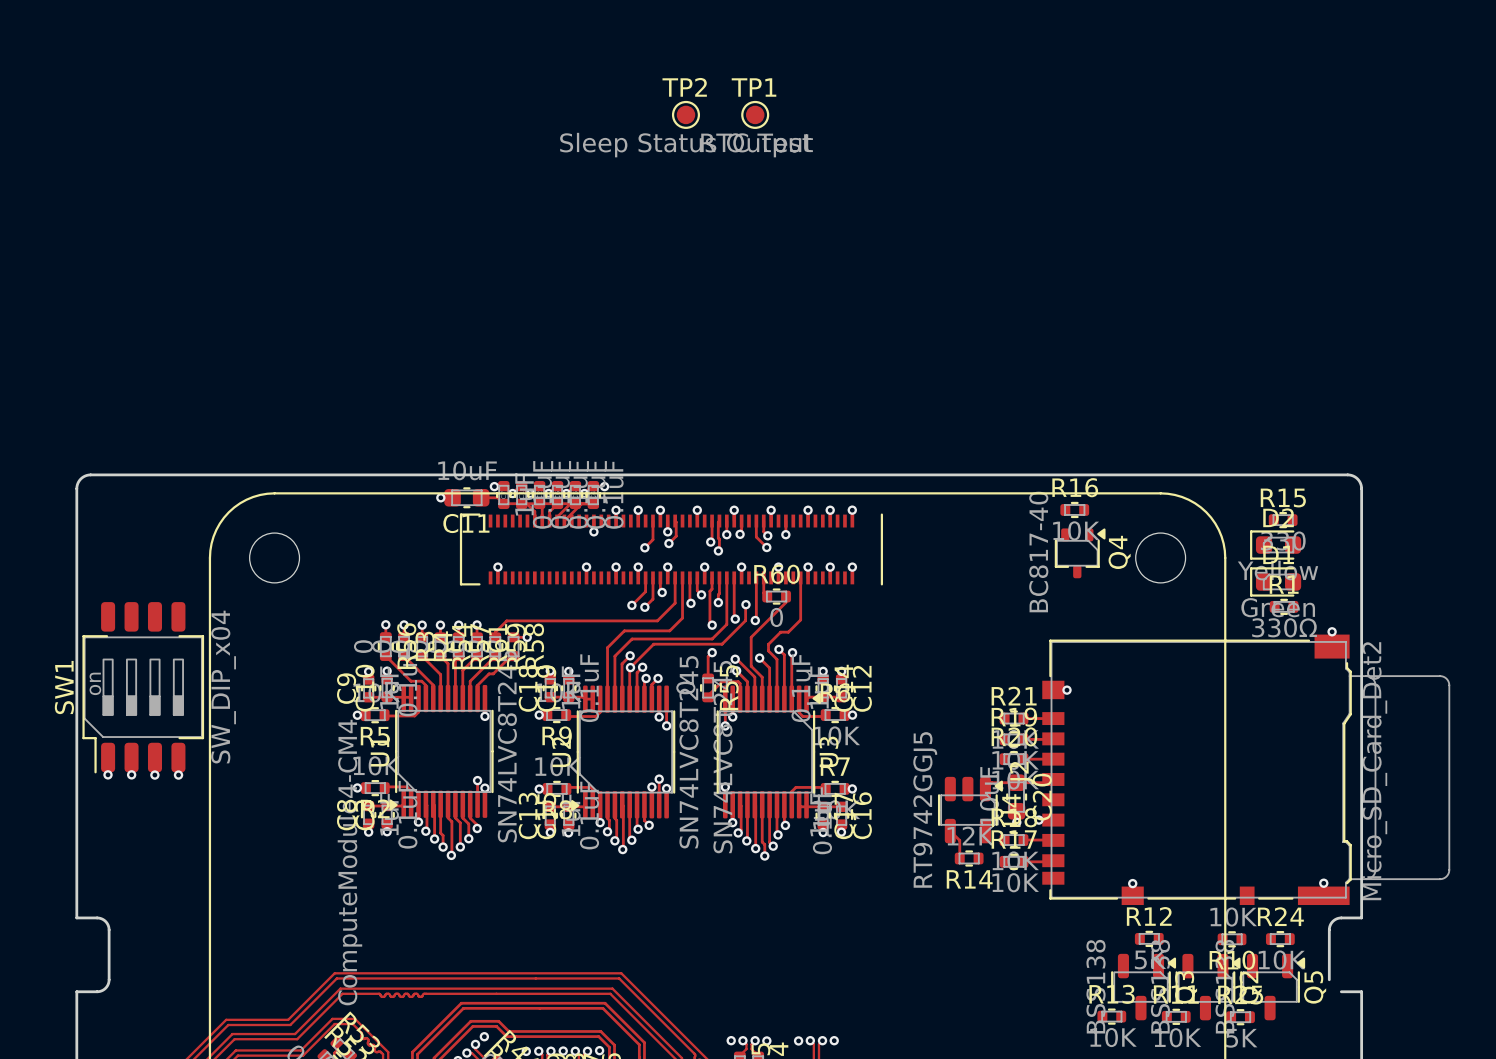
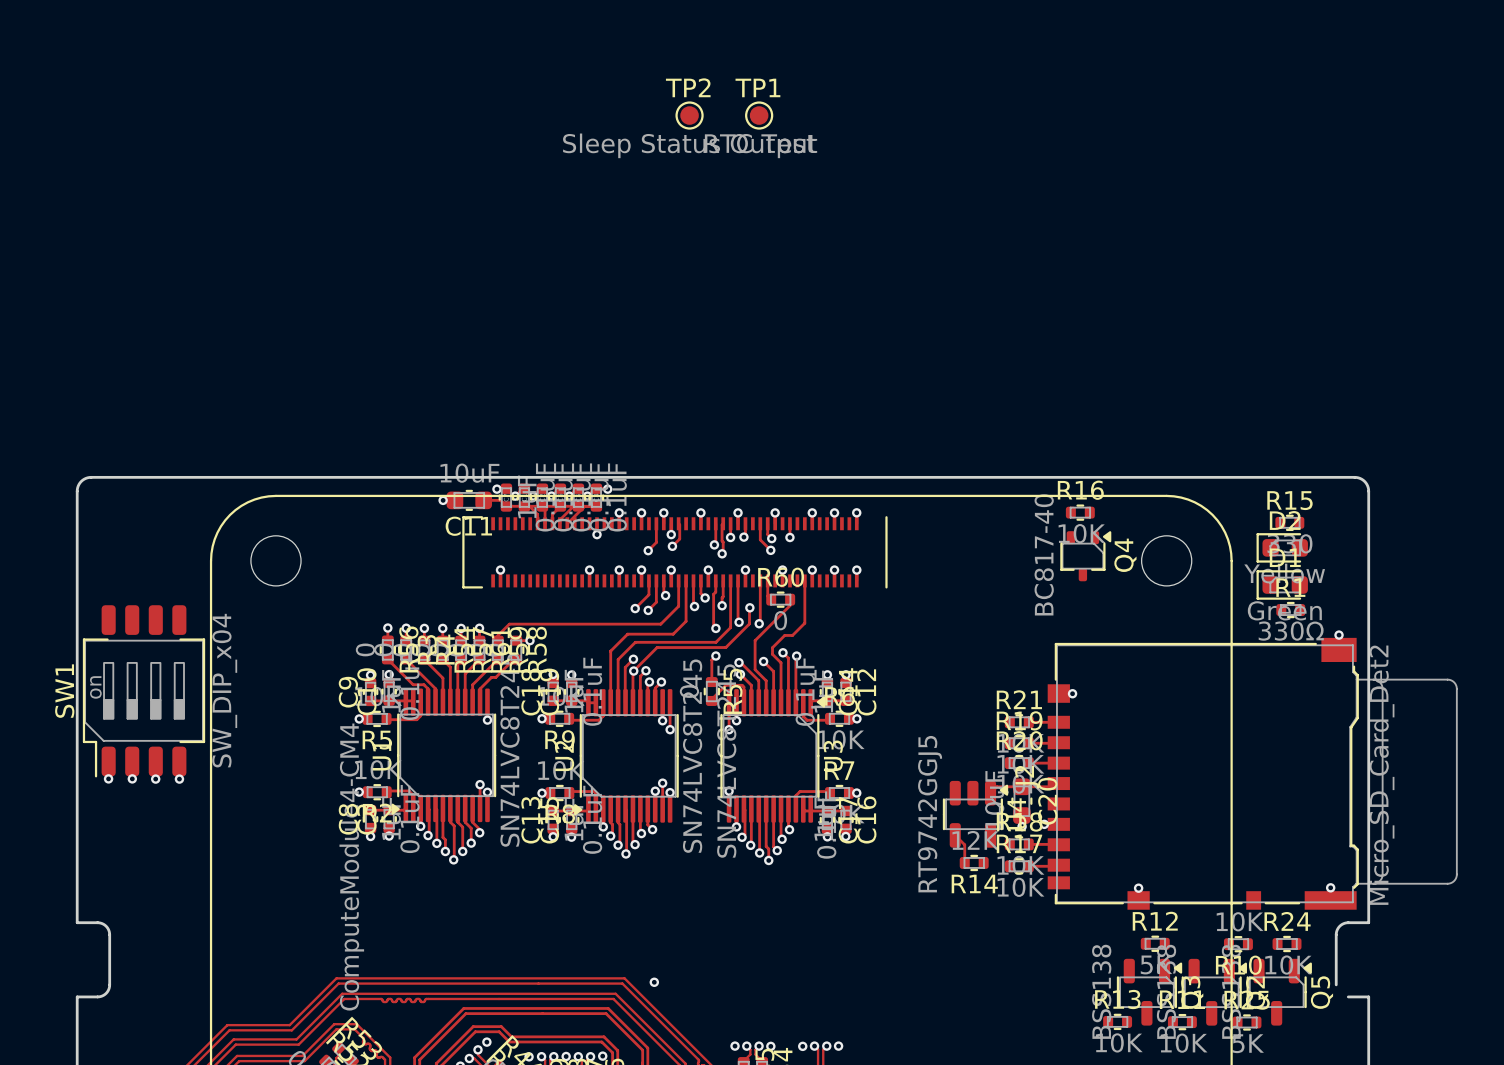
via: none -> (654, 982)

